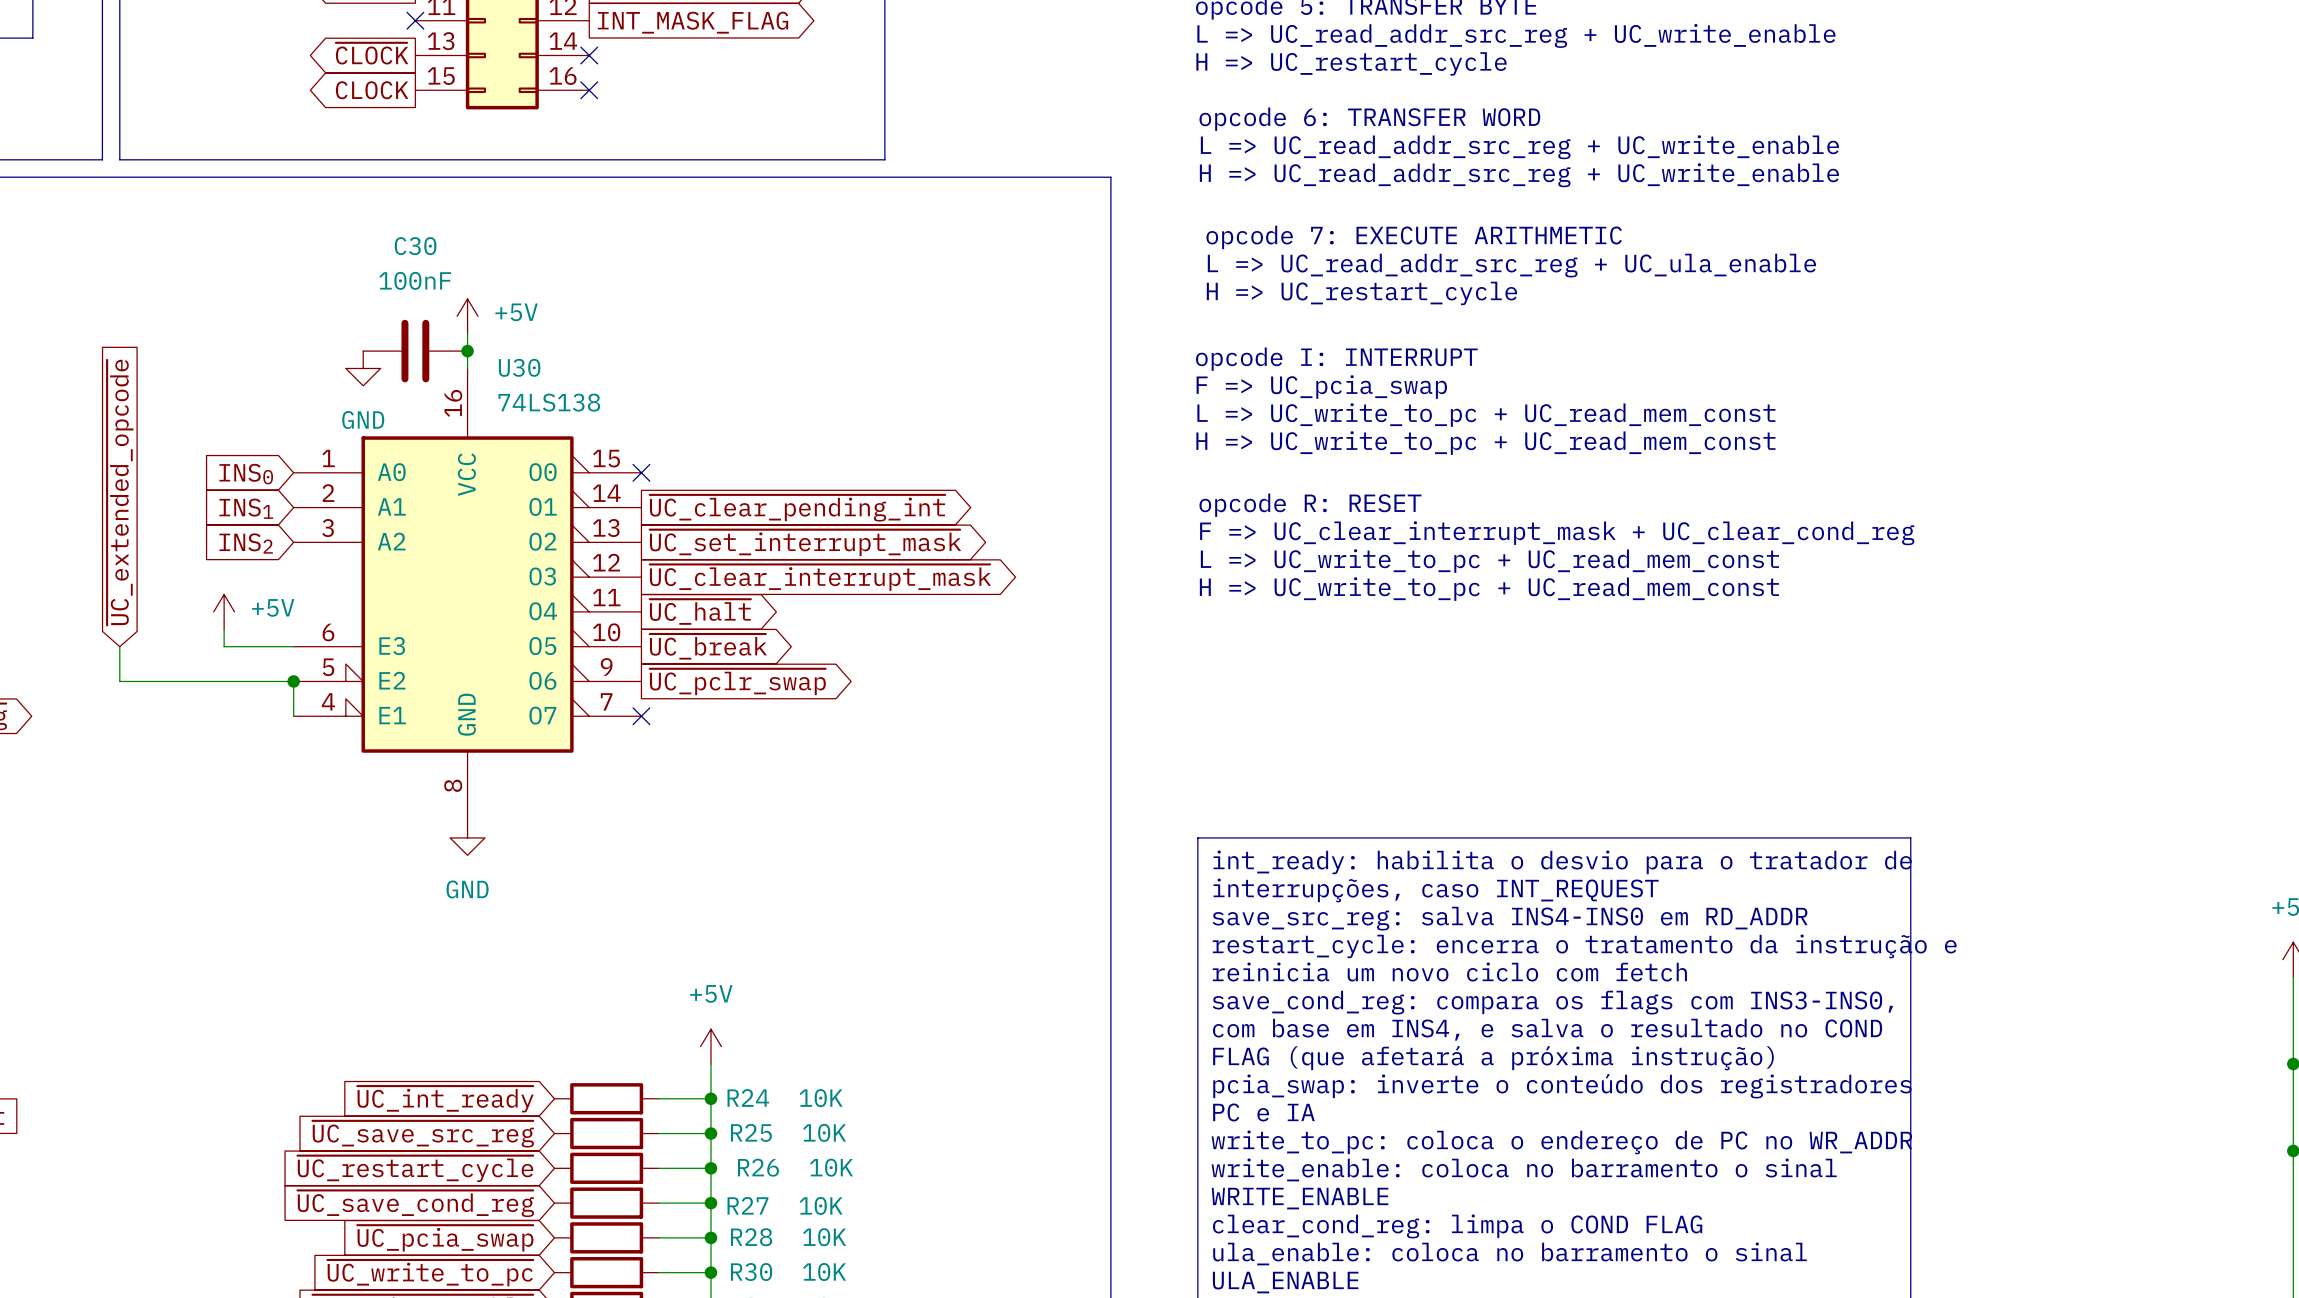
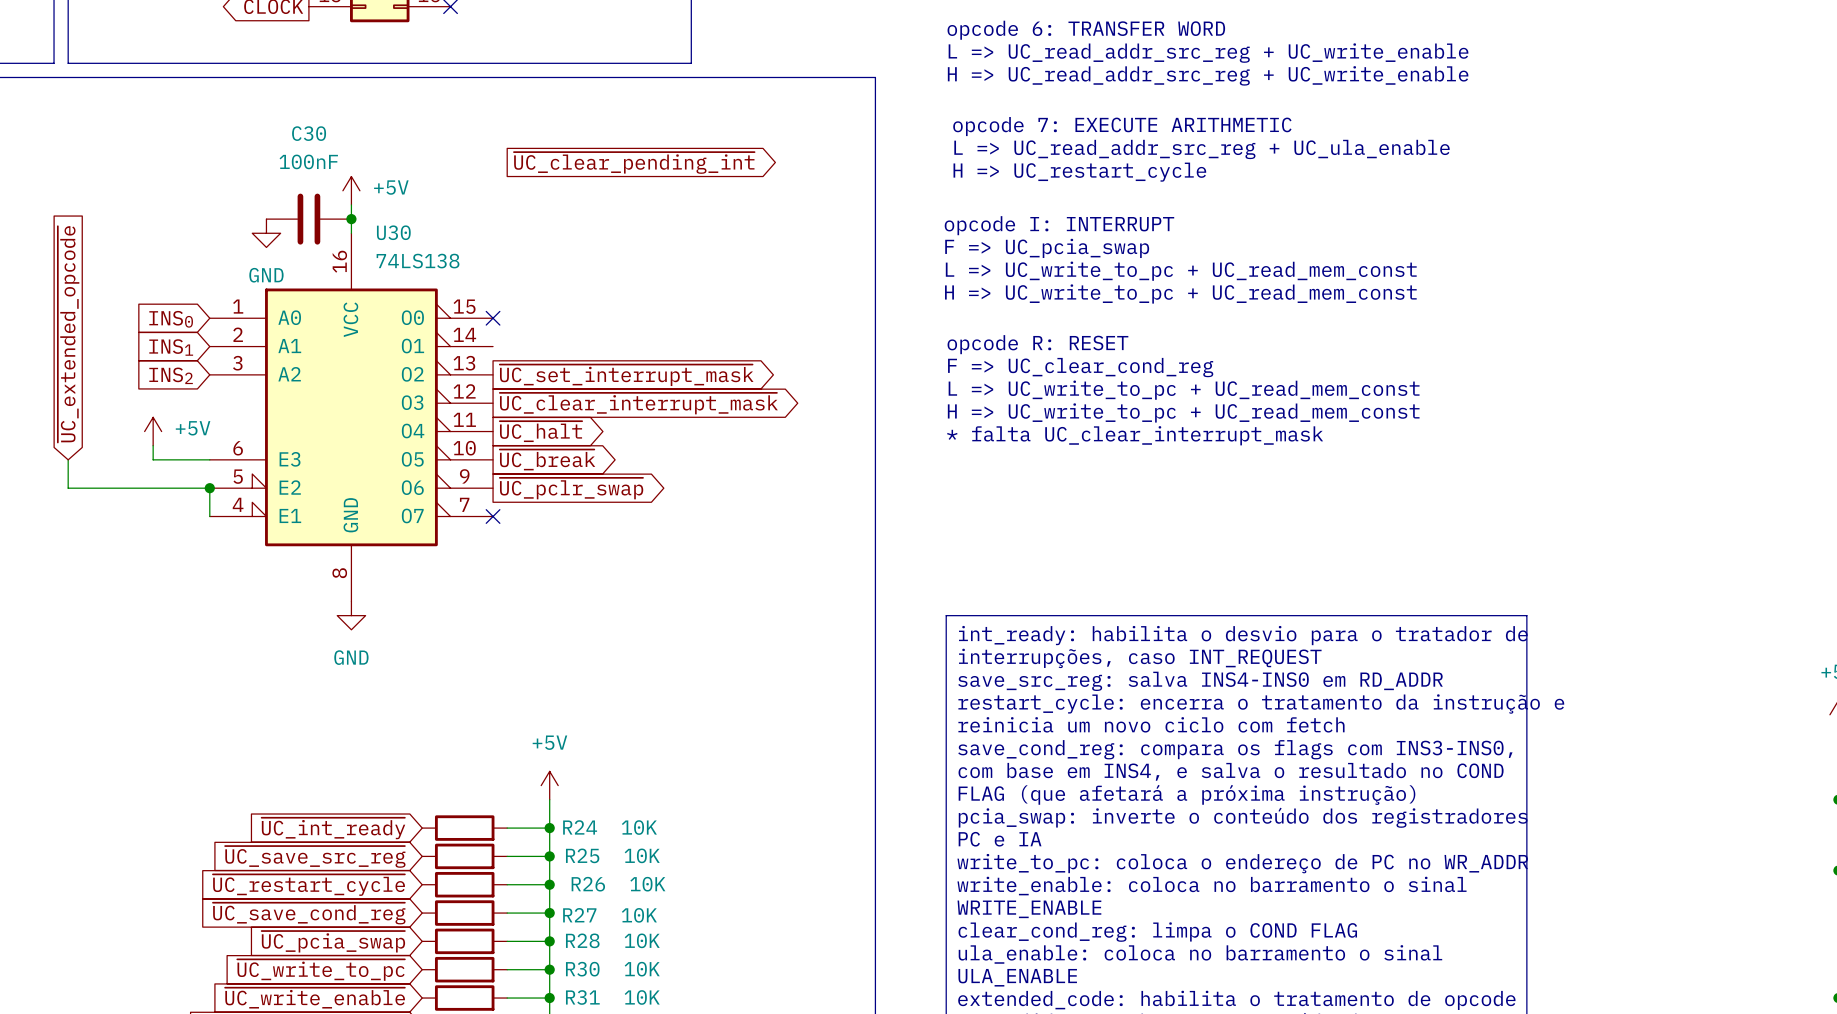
global label position: ~{UC_clear_pending_int} (797, 508) -> ~{UC_clear_pending_int} (634, 162)
text: F => UC_clear_interrupt_mask + UC_clear_cond_reg (1557, 533) -> F => UC_clear_cond_reg (1080, 367)
text: none -> * falta UC_clear_interrupt_mask (1135, 435)

